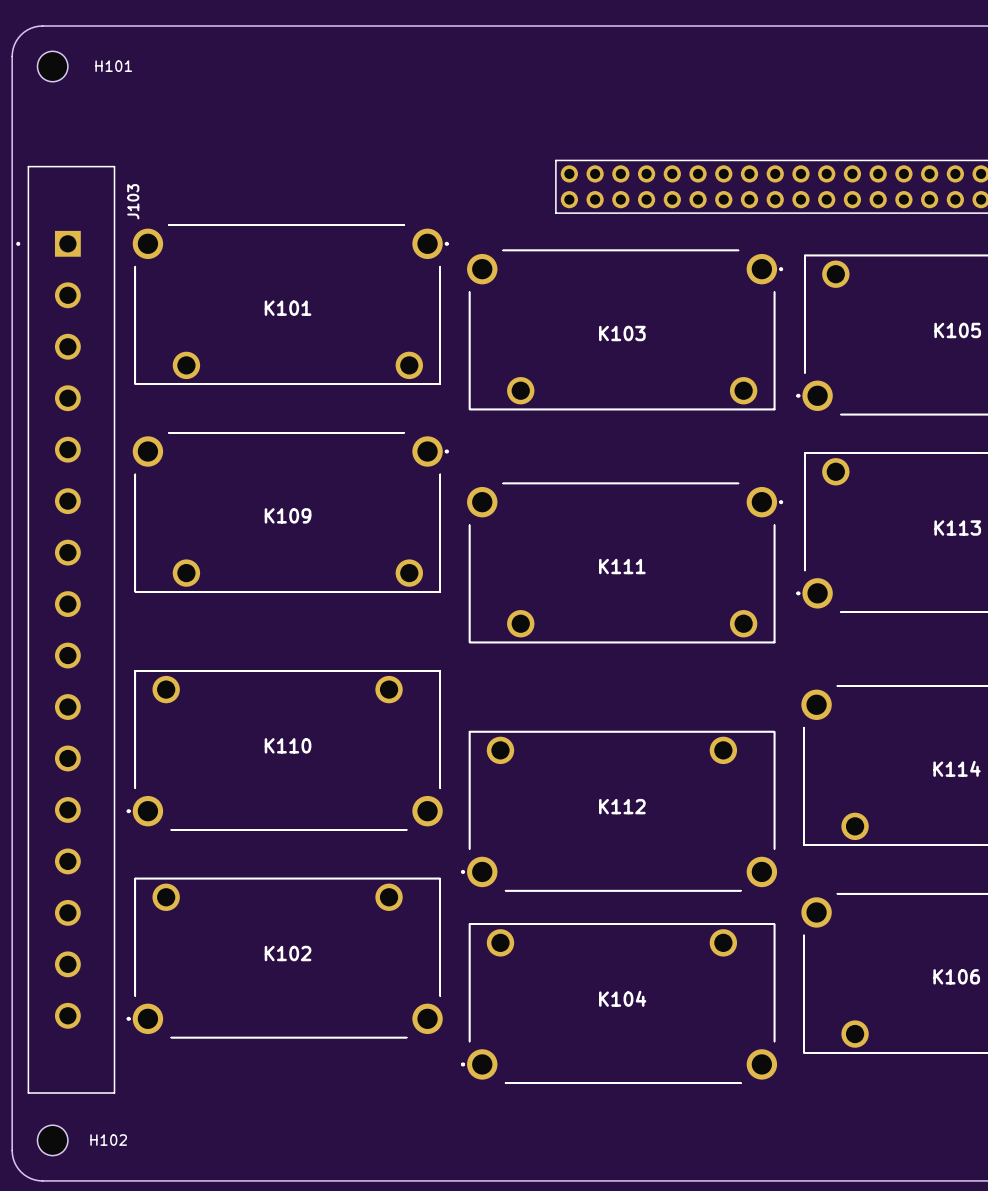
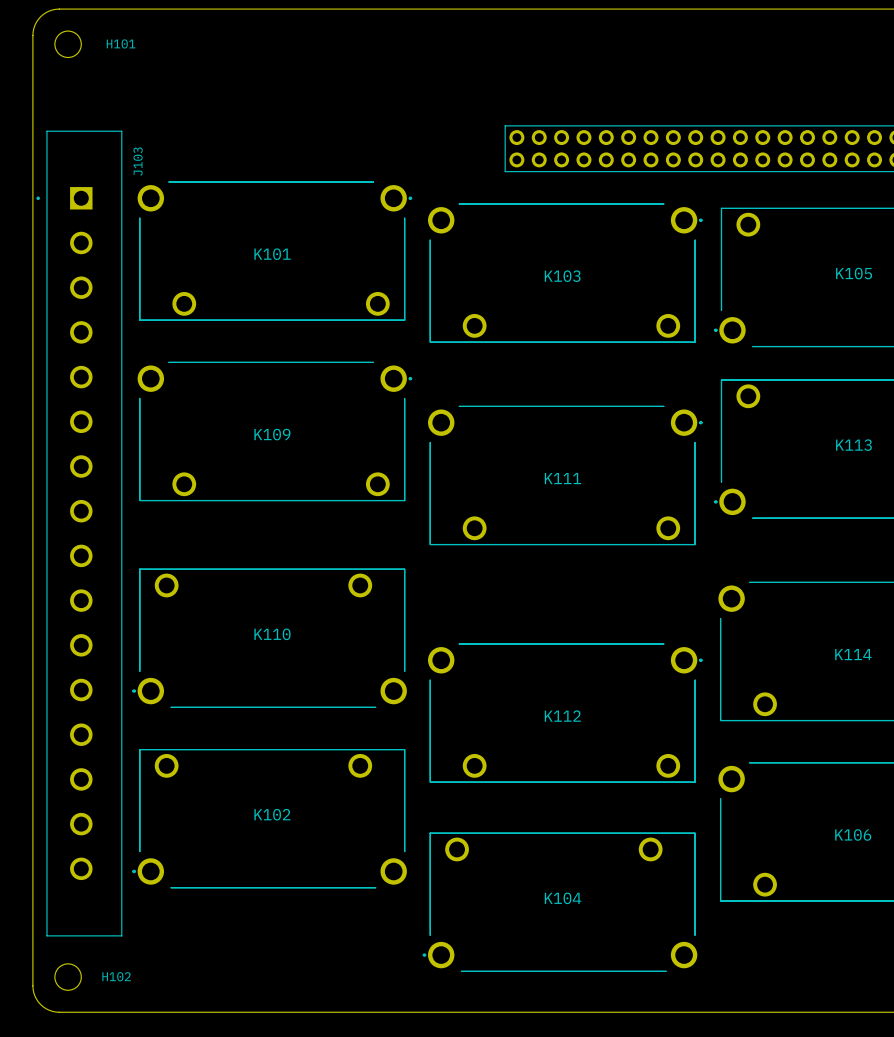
K112 rotation: 0° (619, 811) -> 180° (565, 713)
K104 position: (619, 1003) -> (560, 902)

